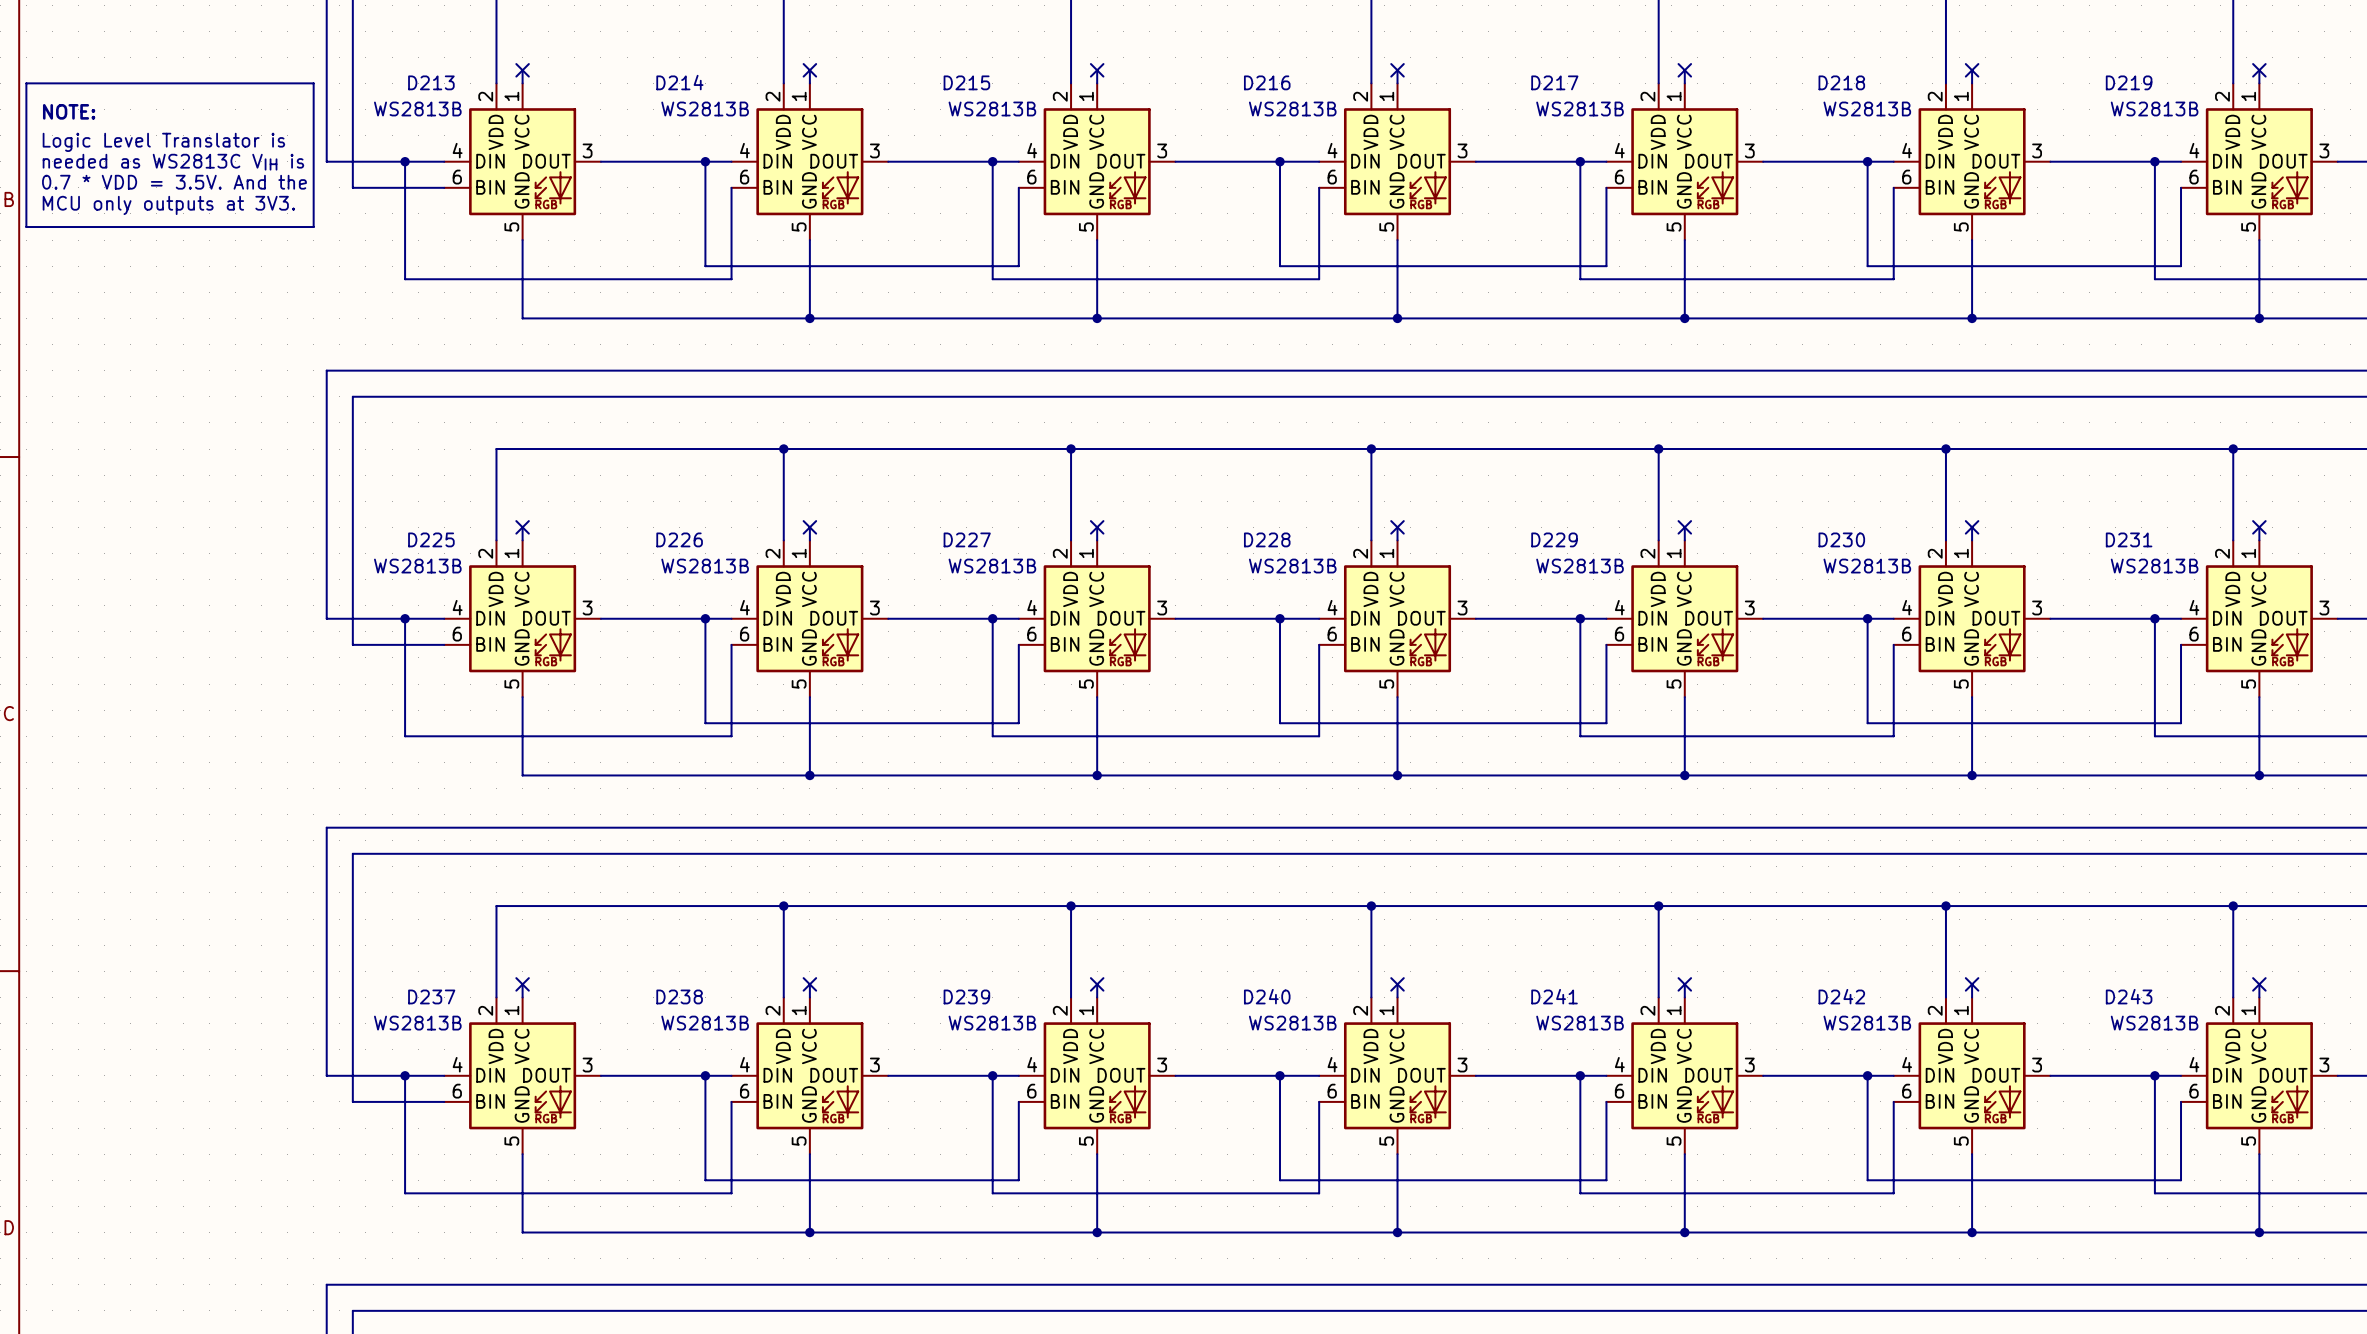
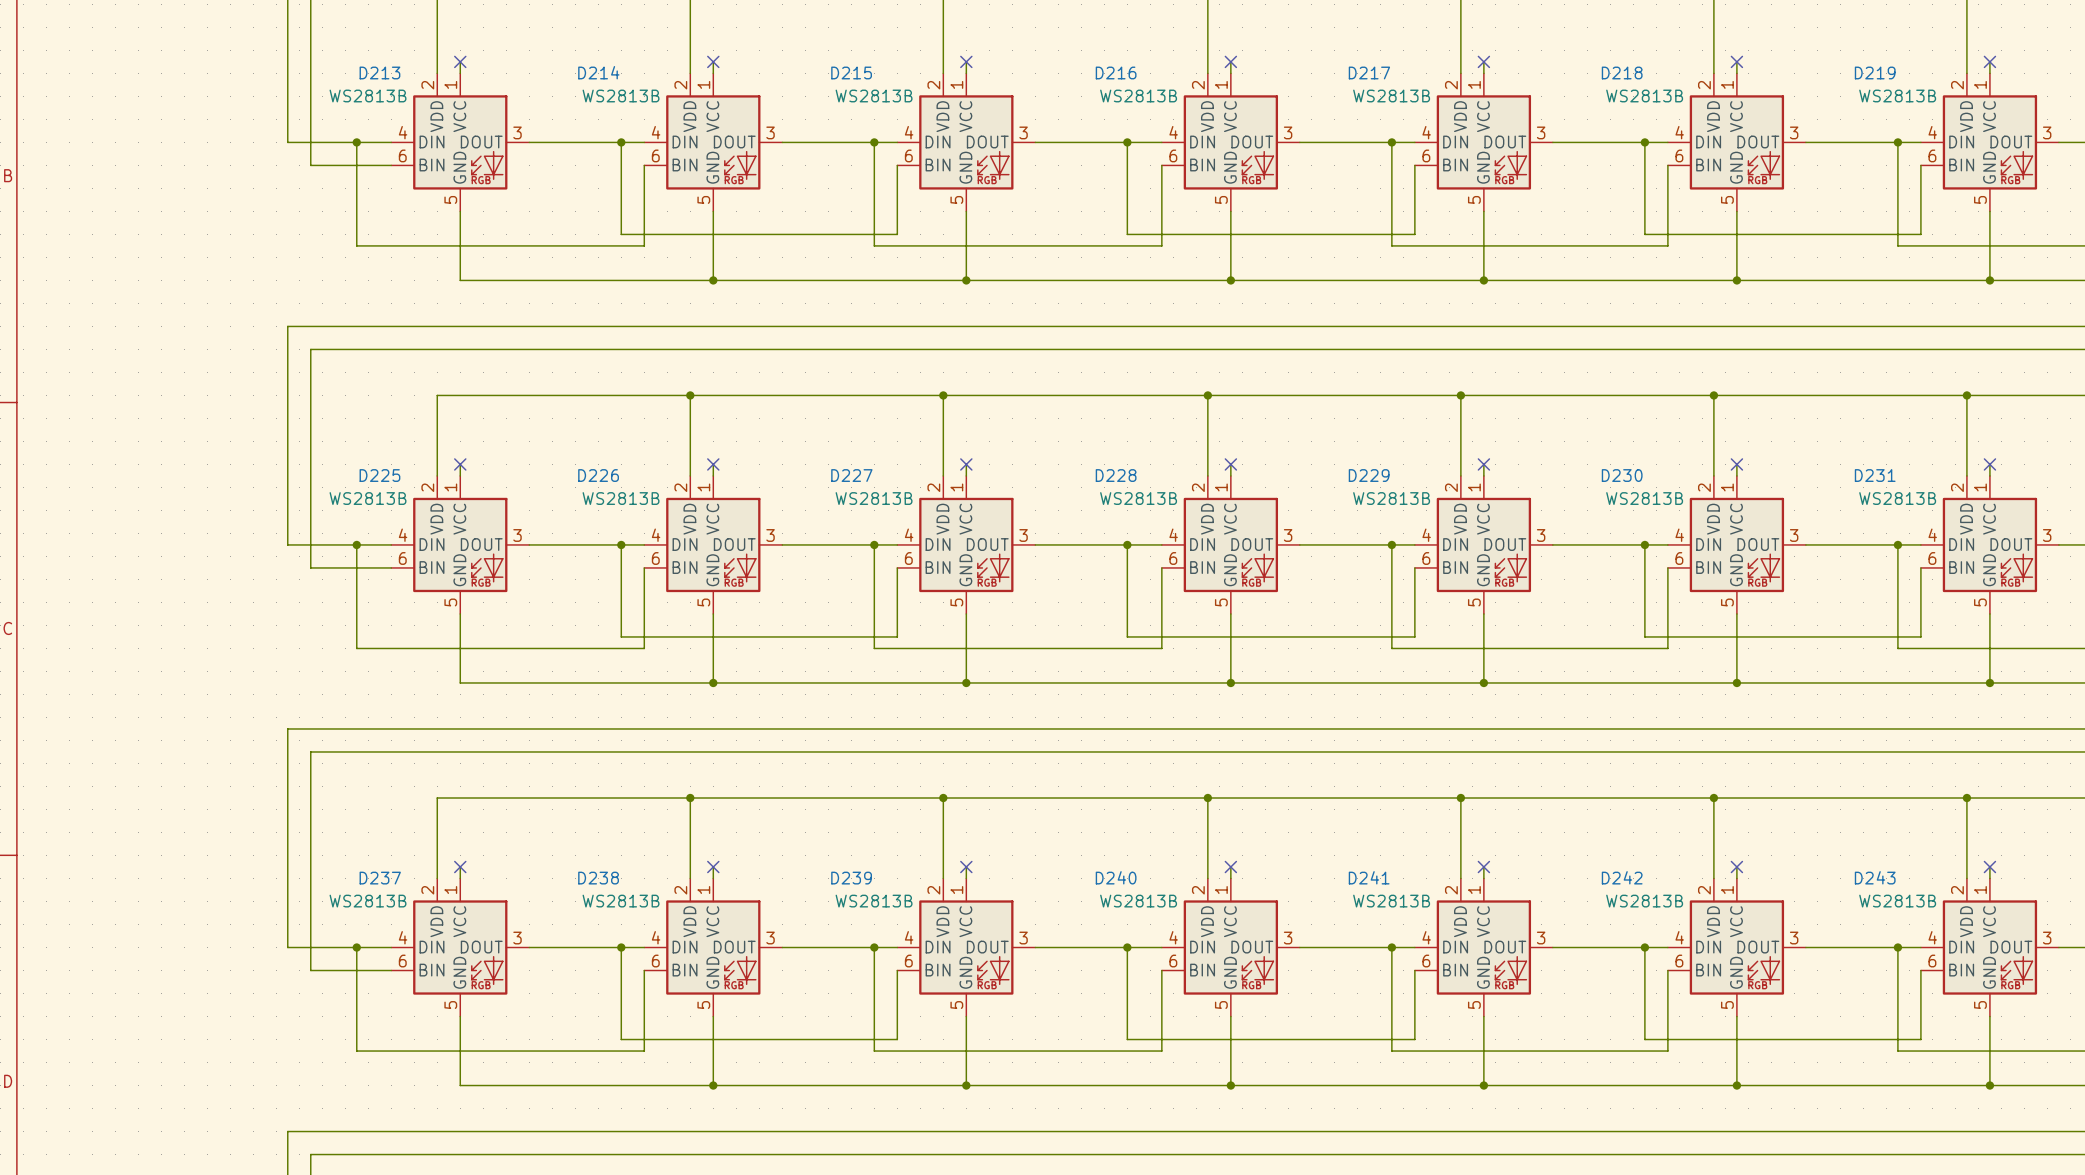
line: (26, 83) (26, 227) (313, 227) (313, 83) (26, 83) -> none
text: NOTE: (69, 111) -> none
text: Logic Level Translator is (163, 142) -> none
text: needed as WS2813C VIH is (173, 162) -> none
text: 0.7 * VDD = 3.5V. And the (174, 182) -> none
text: MCU only outputs at 3V3. (168, 205) -> none

